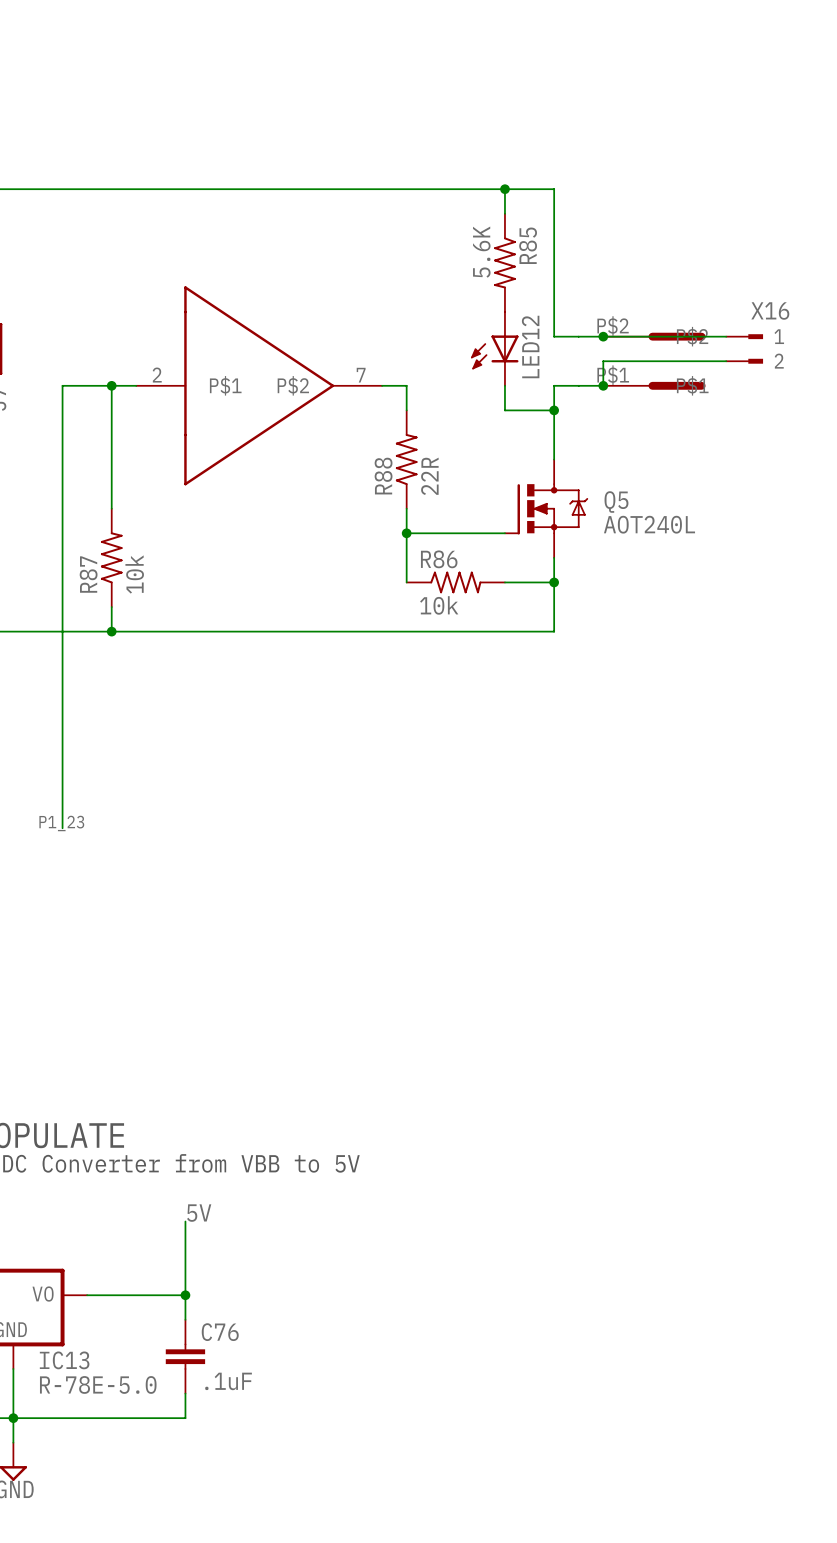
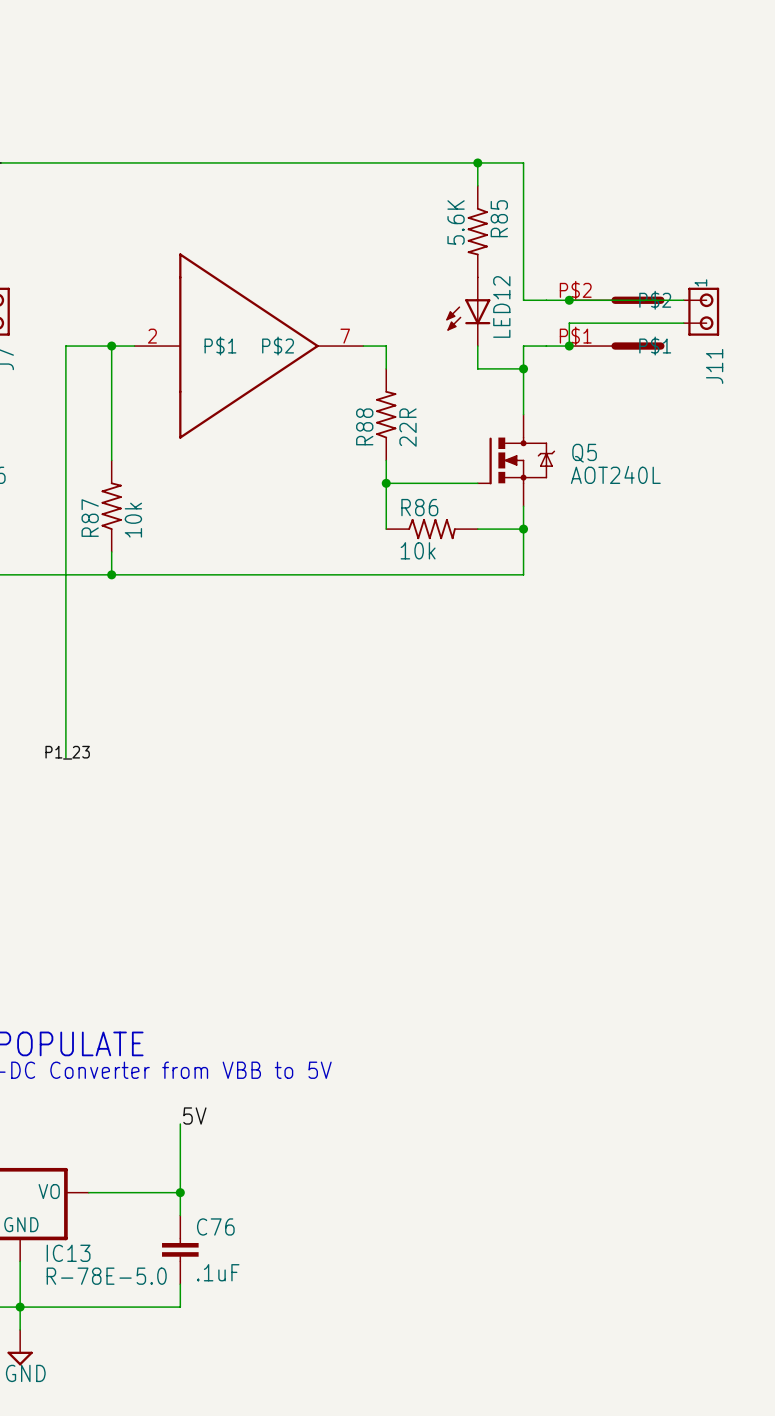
X16: (744, 348) -> none
J11: none -> (701, 311)

